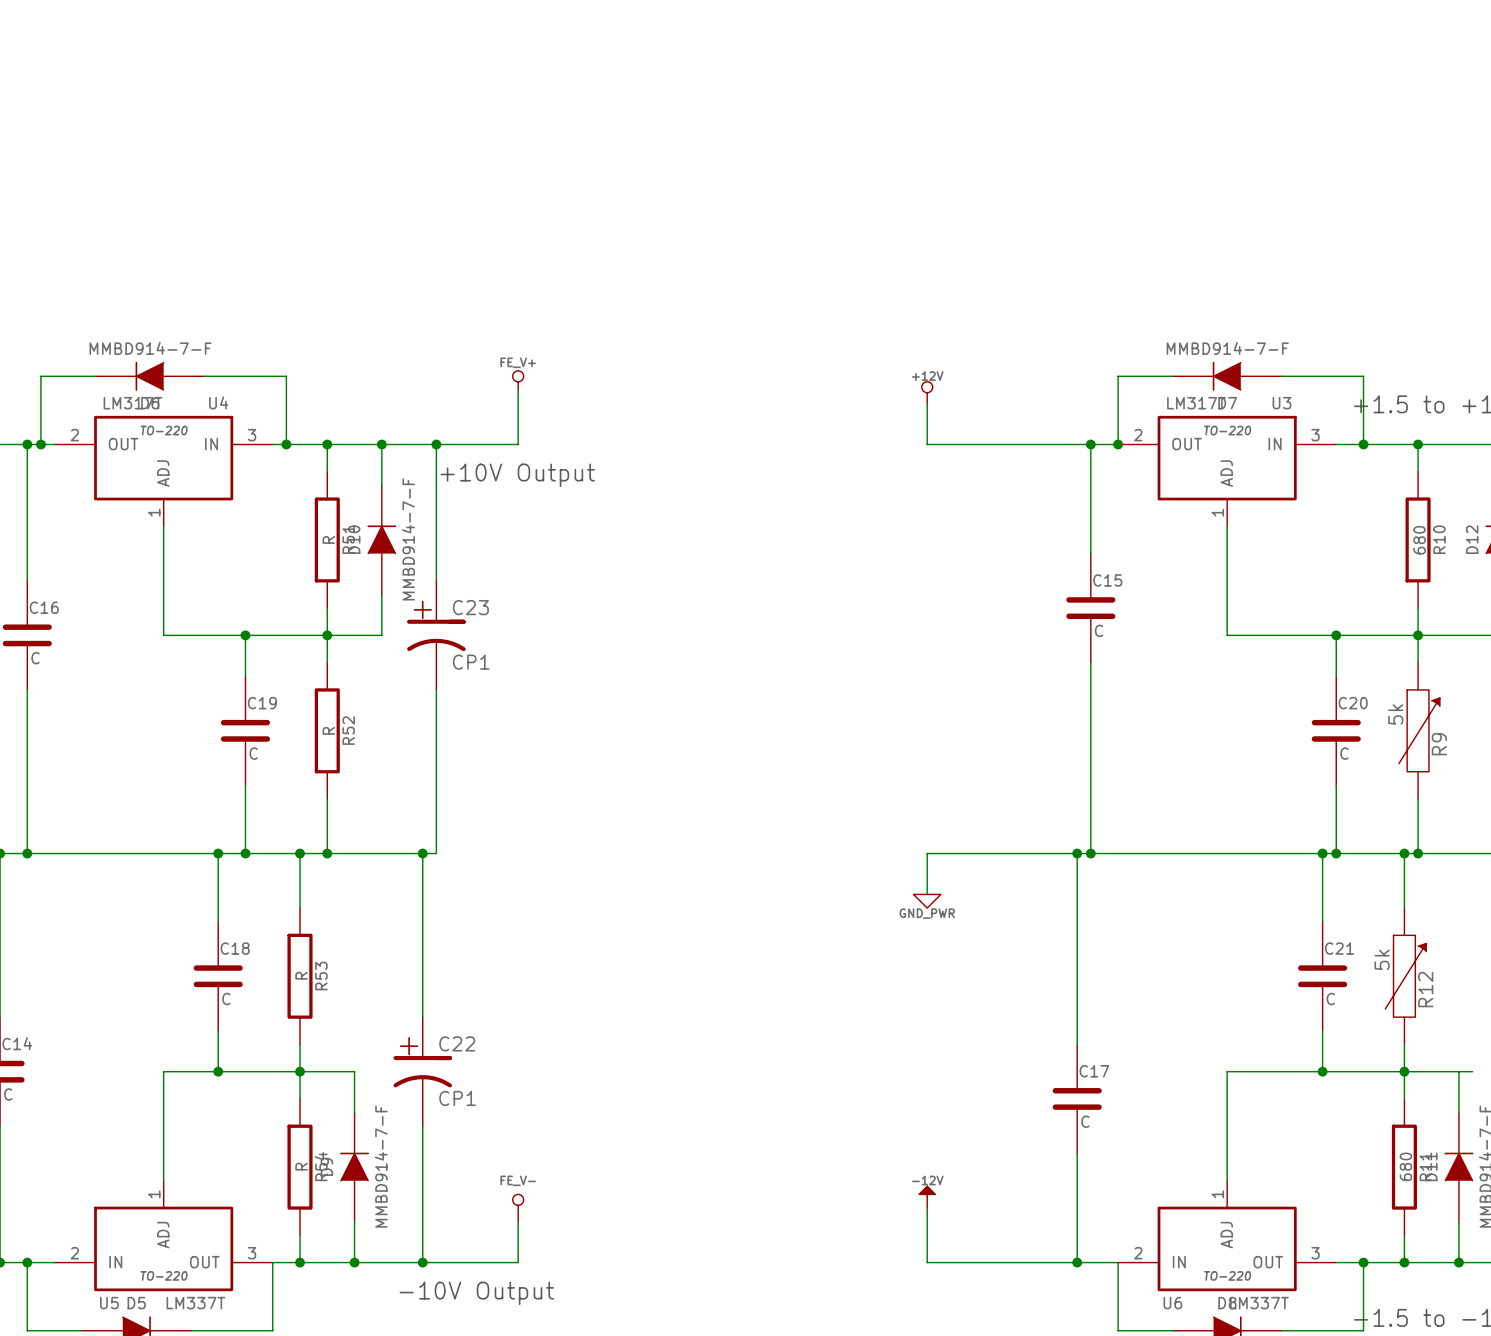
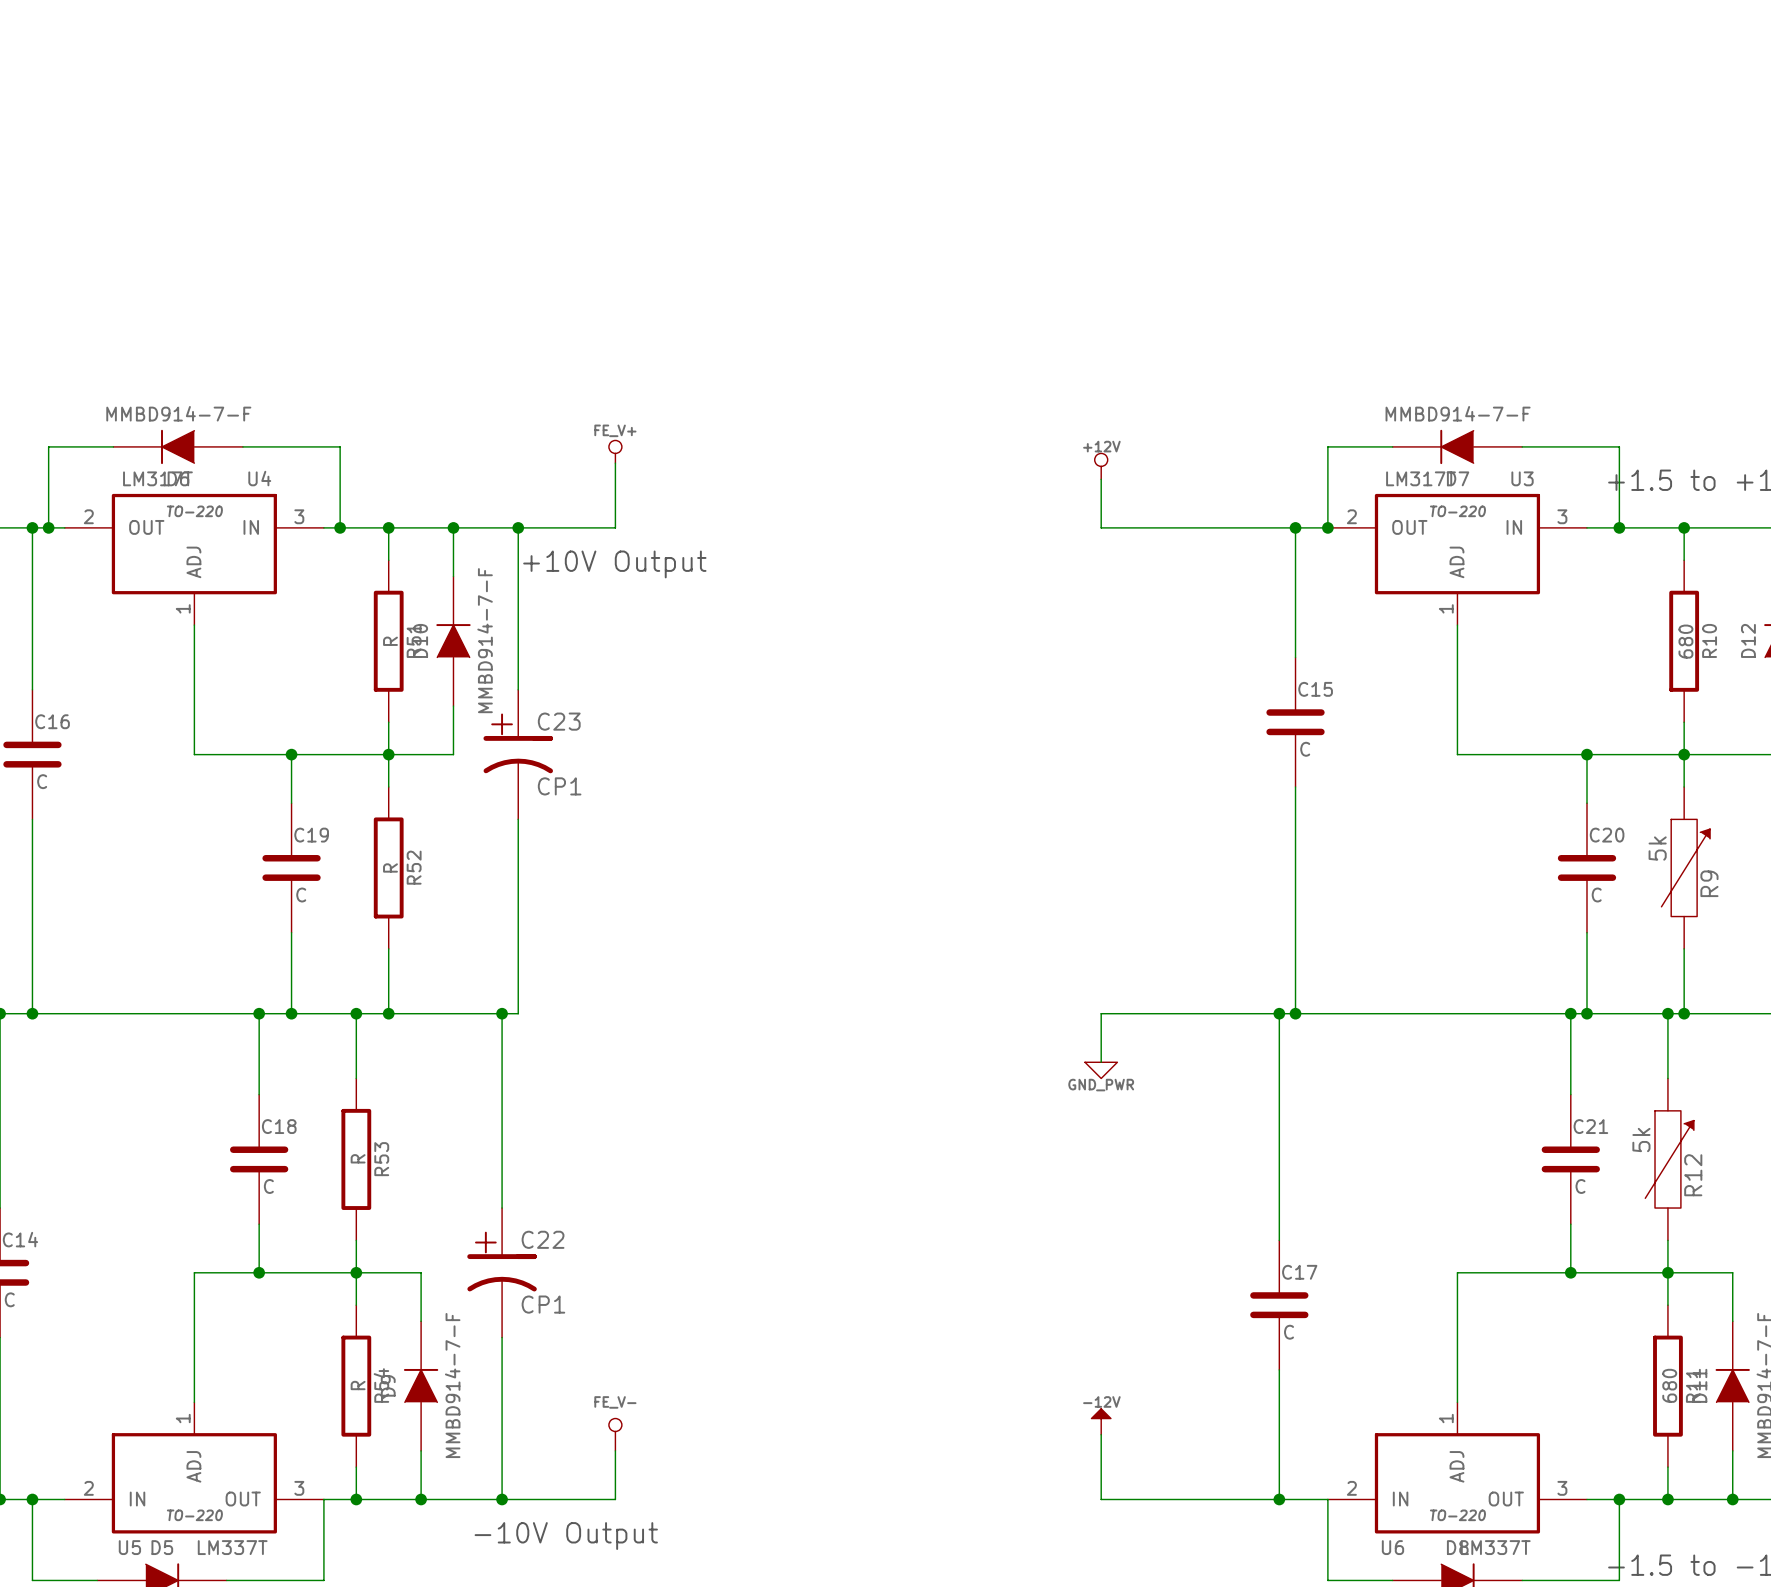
wire: (1458, 1071) (1472, 1071) -> none

